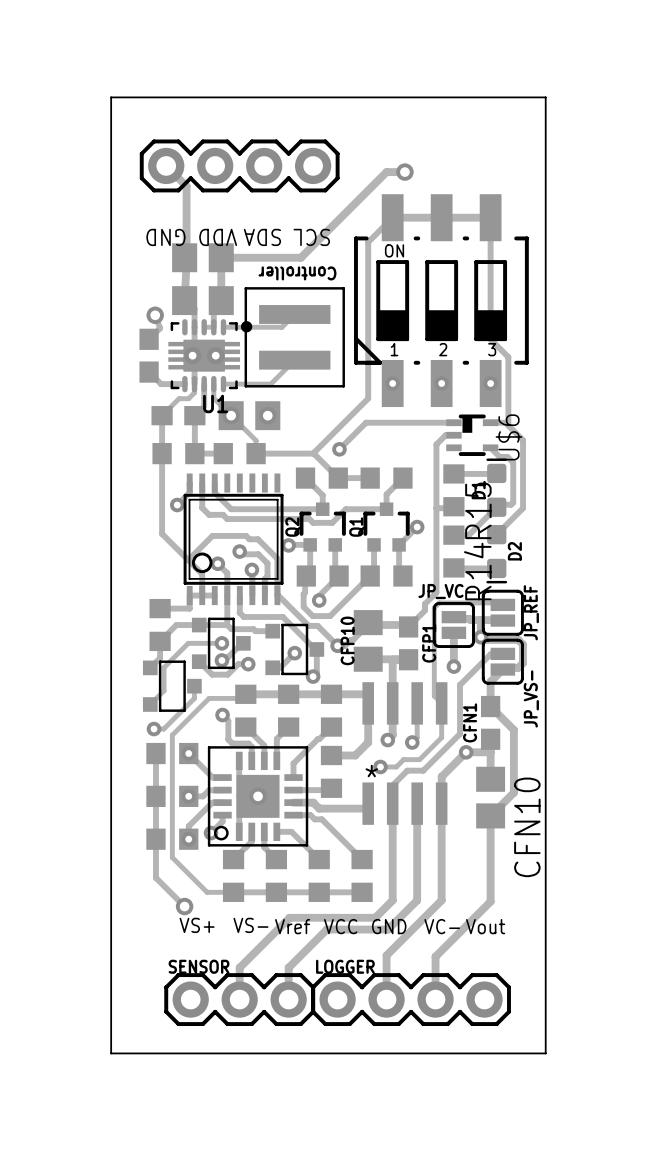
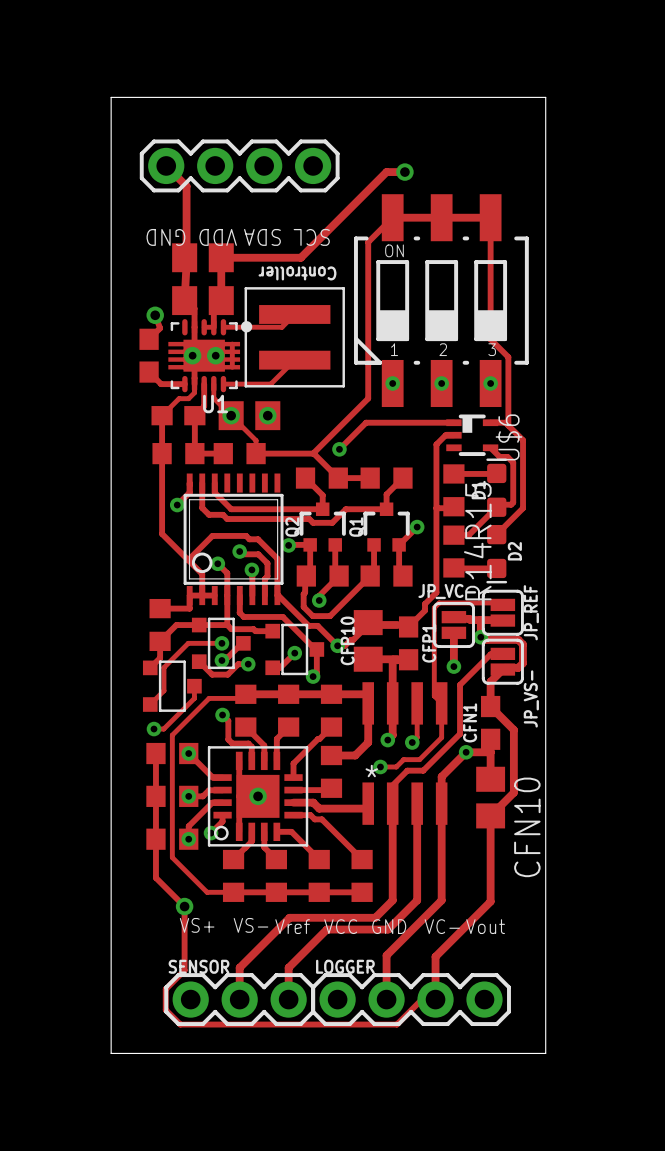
track: none -> (232, 344) (232, 367)
track: none -> (184, 906) (184, 970) (165, 989) (165, 1009) (180, 1024) (396, 1024) (421, 999) (435, 999)

